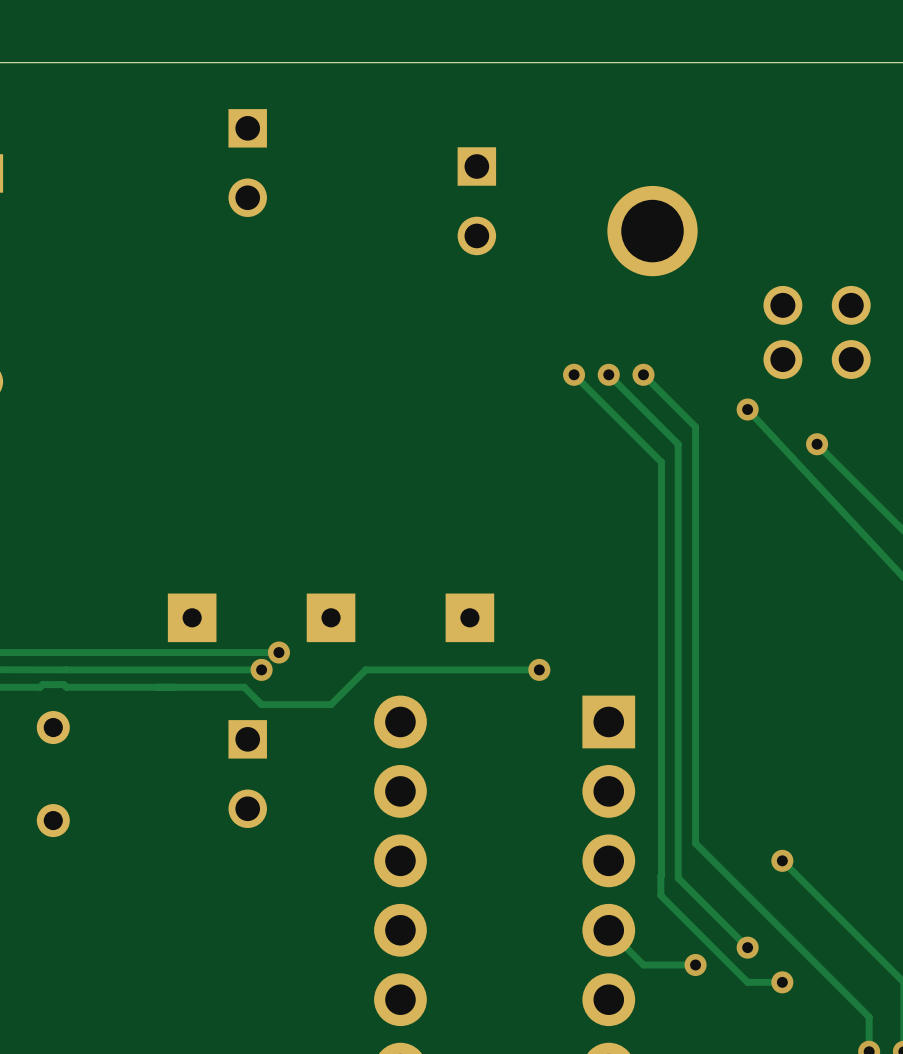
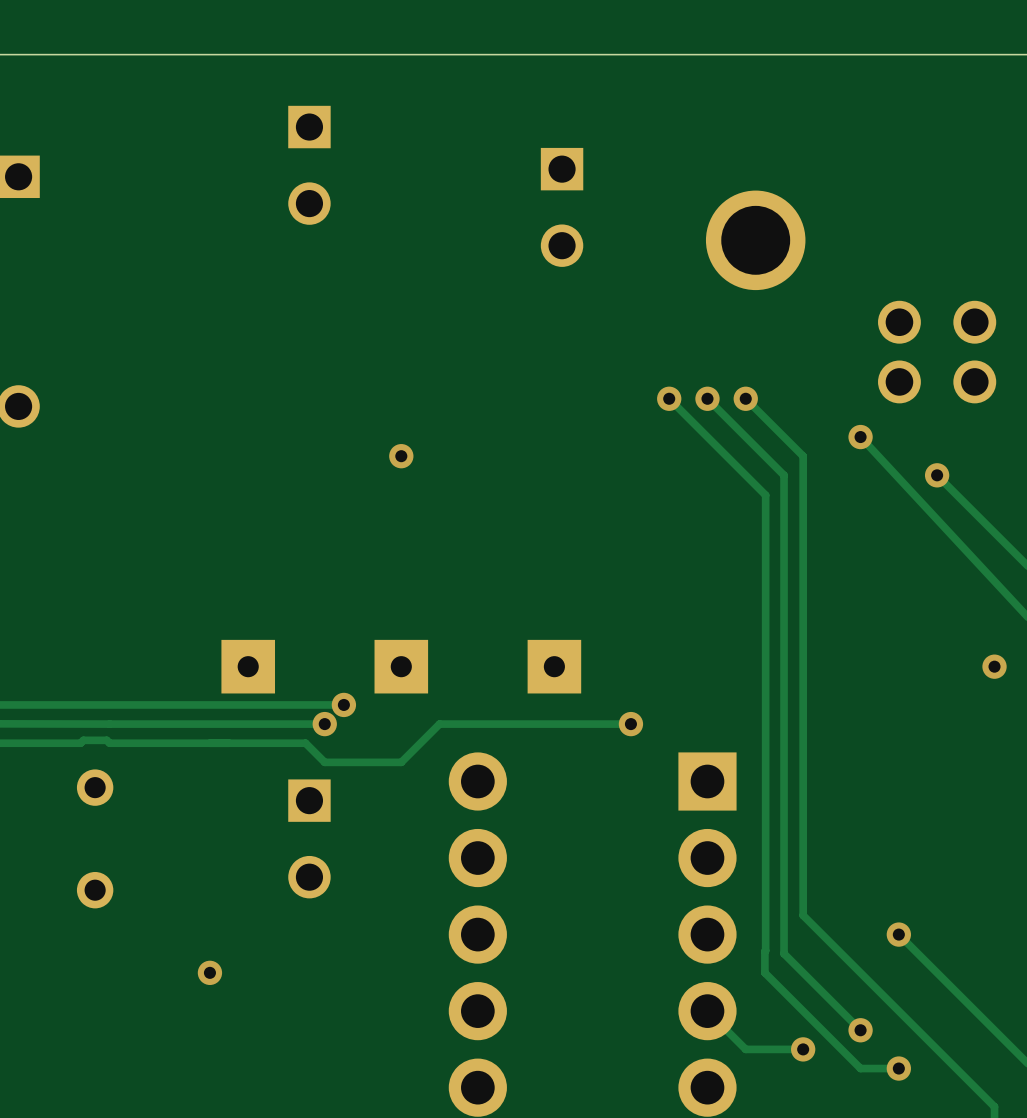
via: none -> (401, 456)
via: none -> (994, 666)
via: none -> (209, 972)

